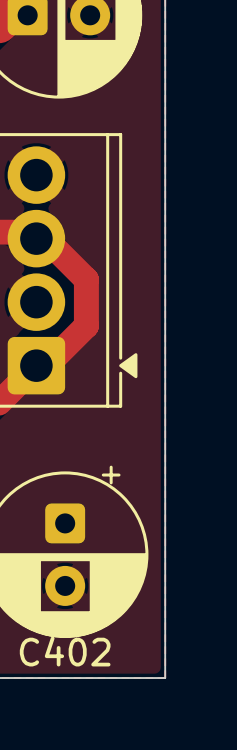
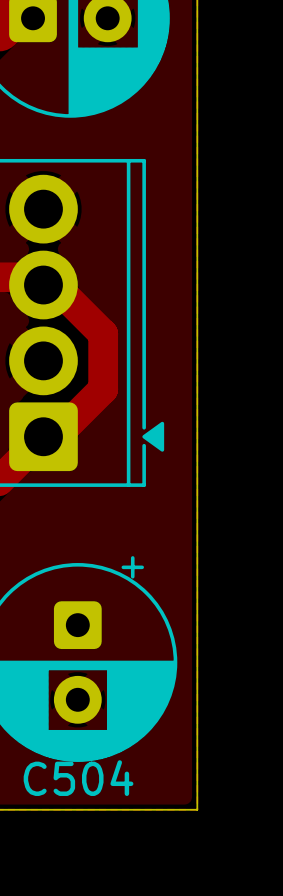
C402 name: C402 (65, 651) -> C504 (78, 778)

